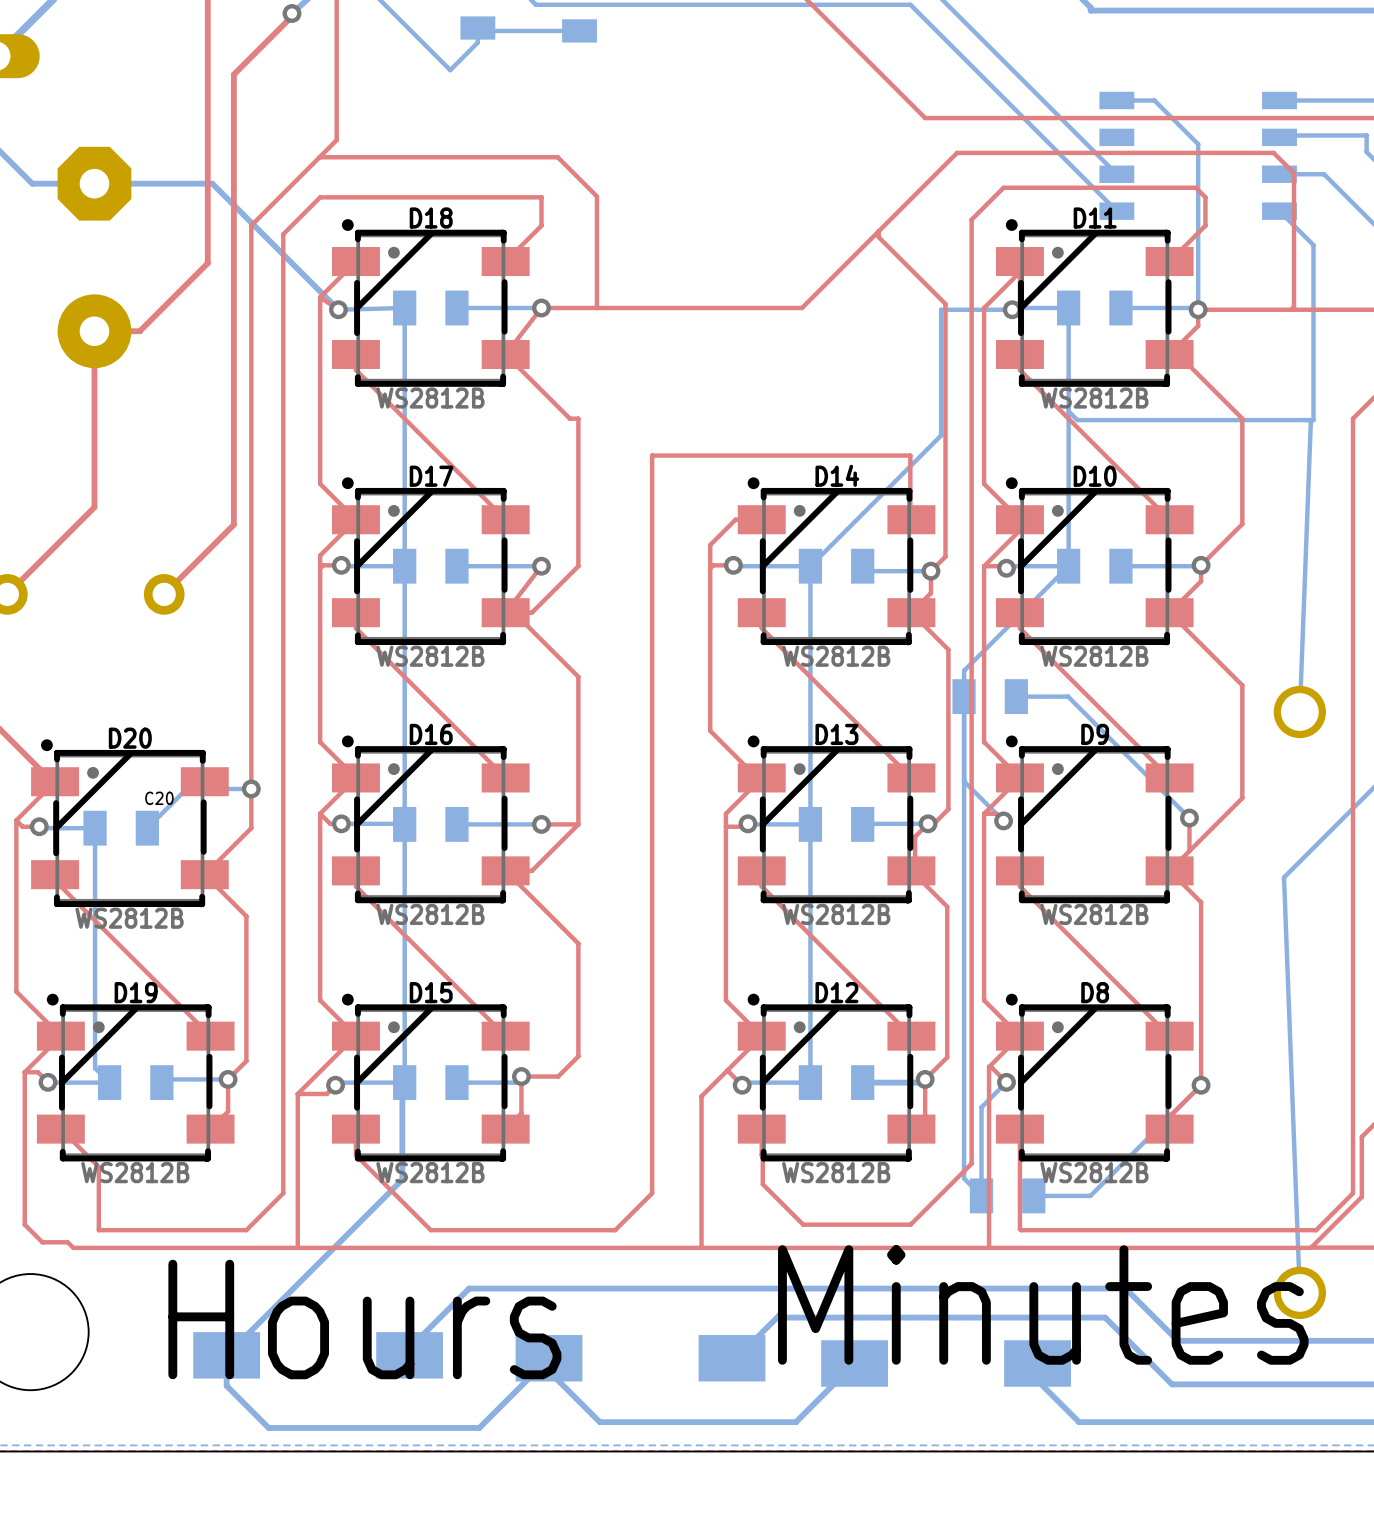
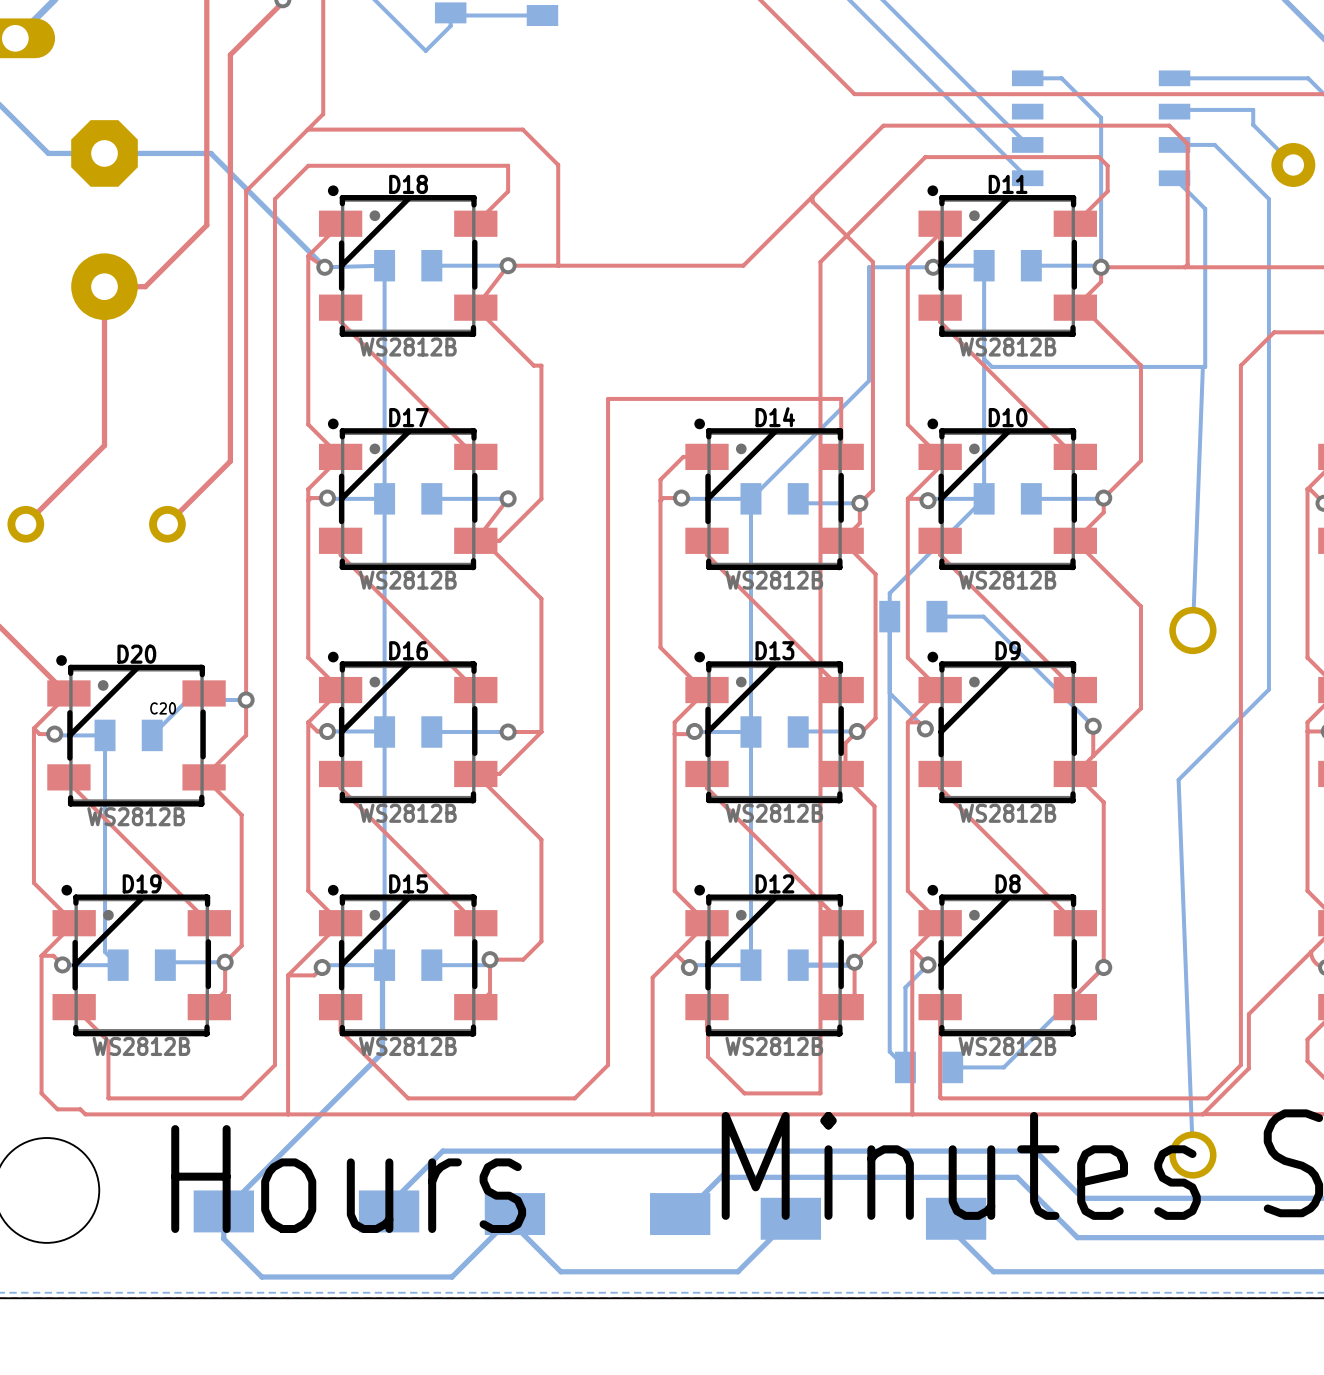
top track: (971, 219) (971, 1163) (910, 1224) (887, 1224) -> (896, 185) (820, 262) (820, 1093)

